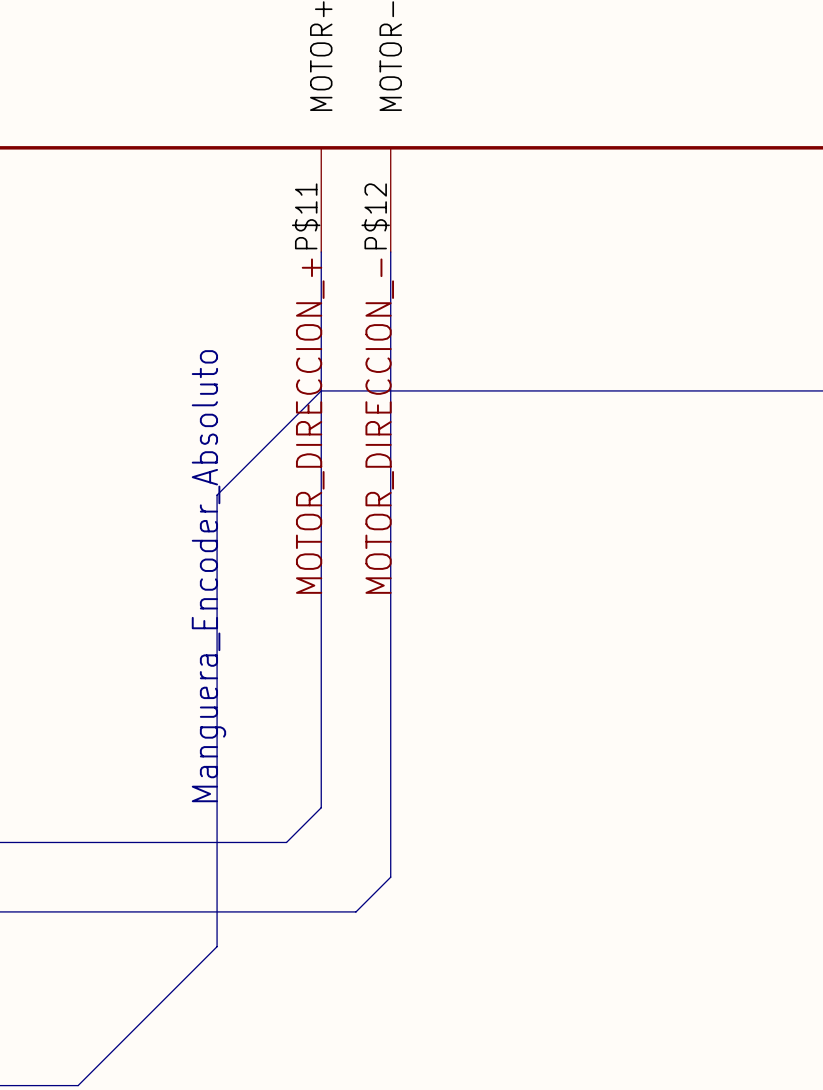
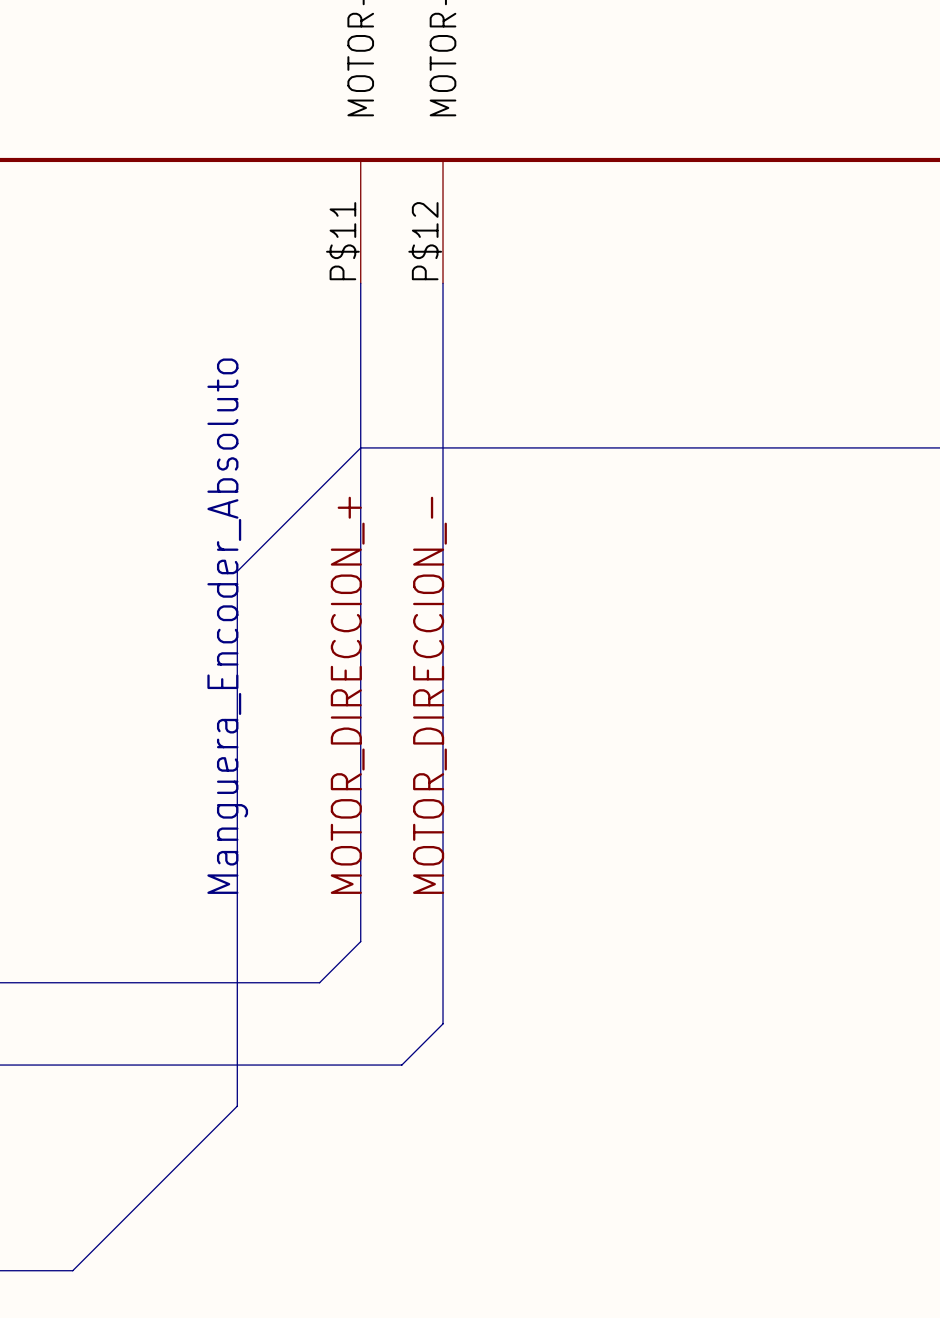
label position: MOTOR_DIRECCION_+ (310, 426) -> MOTOR_DIRECCION_+ (347, 695)
label position: MOTOR_DIRECCION_- (379, 426) -> MOTOR_DIRECCION_- (429, 695)
text position: Manguera_Encoder_Absoluto (208, 576) -> Manguera_Encoder_Absoluto (227, 626)

